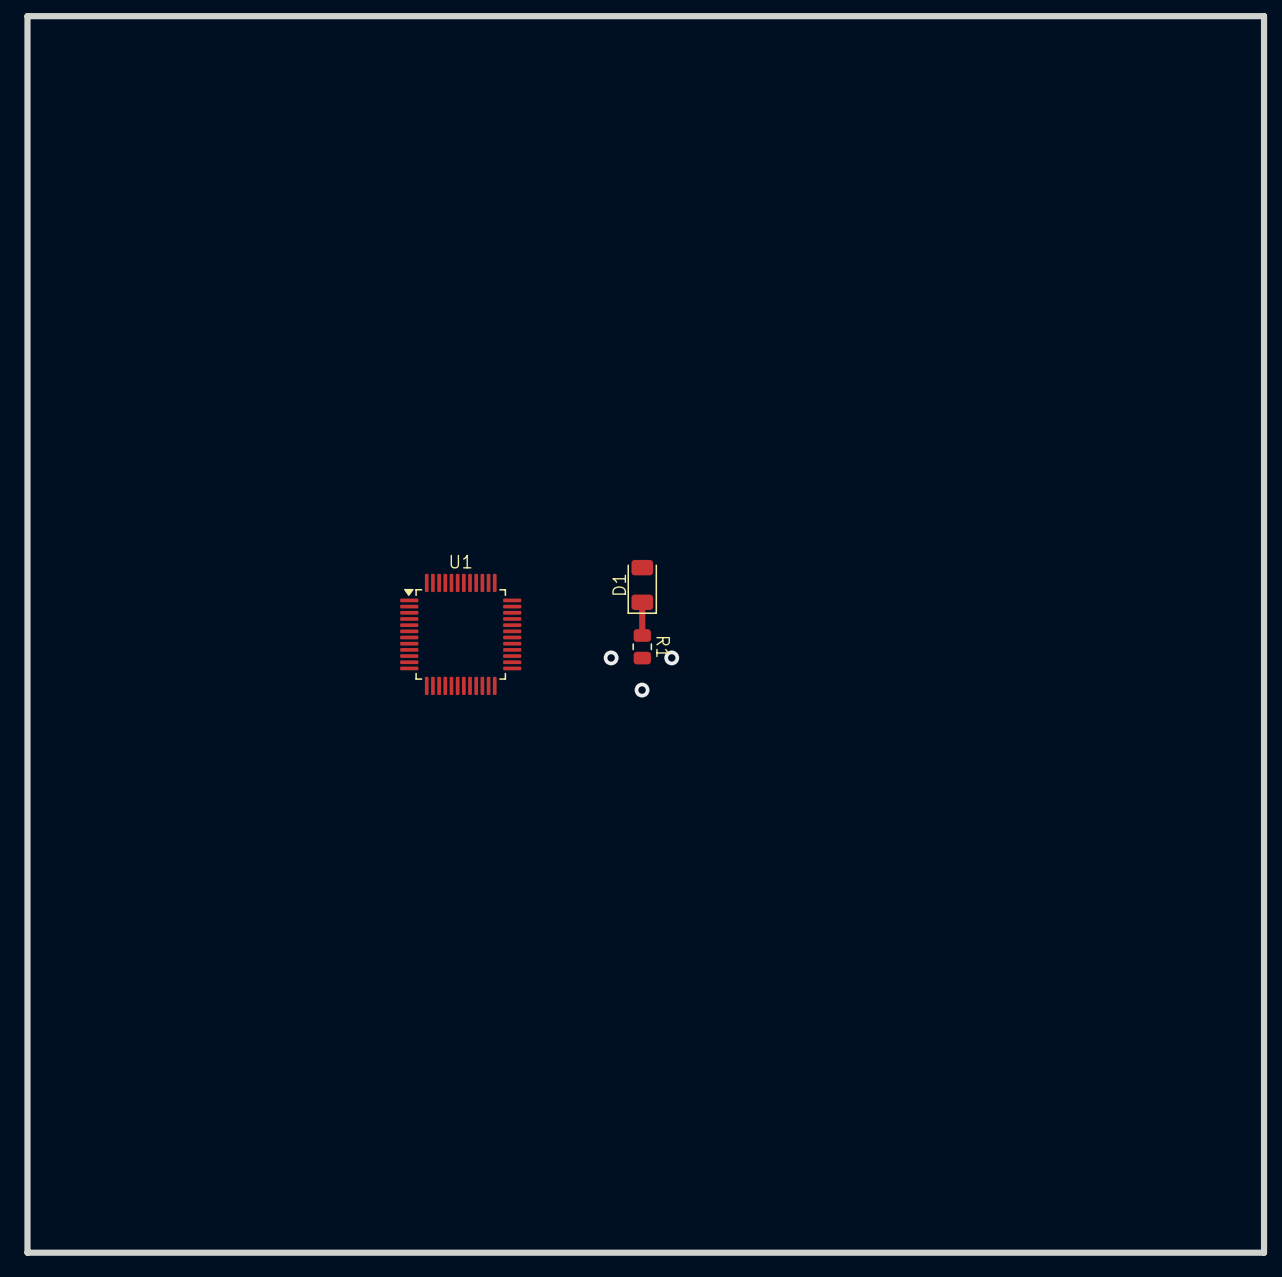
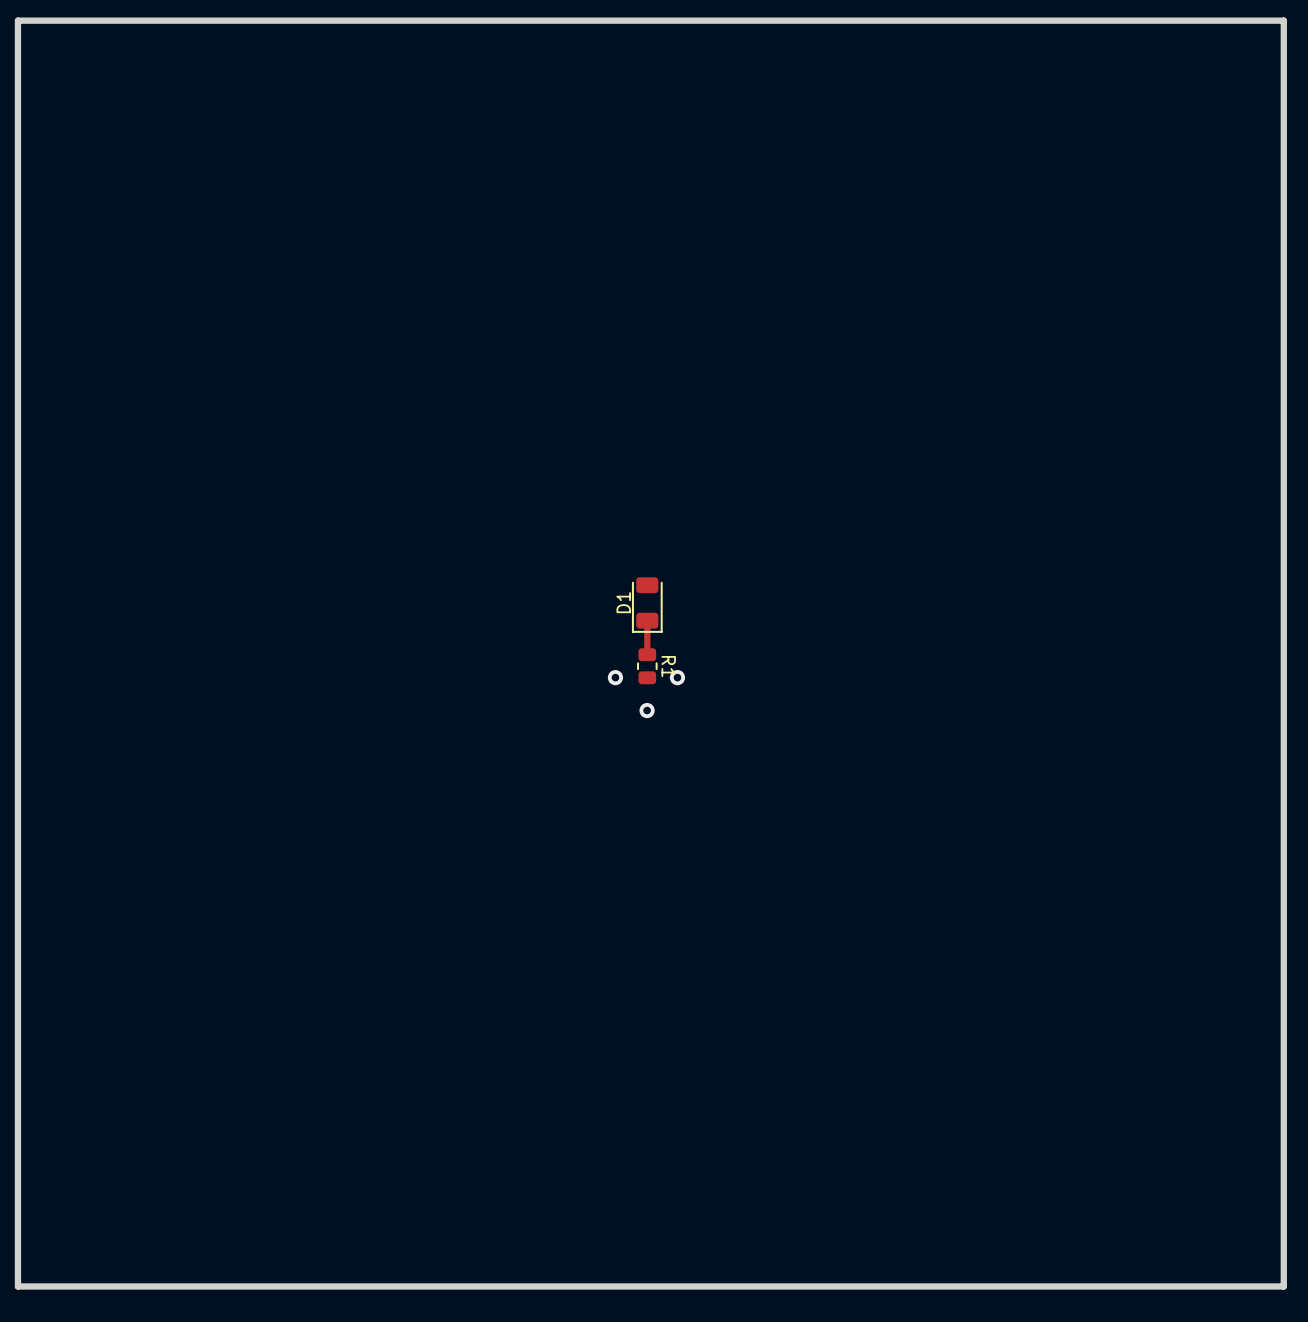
U1: (460, 634) -> none

